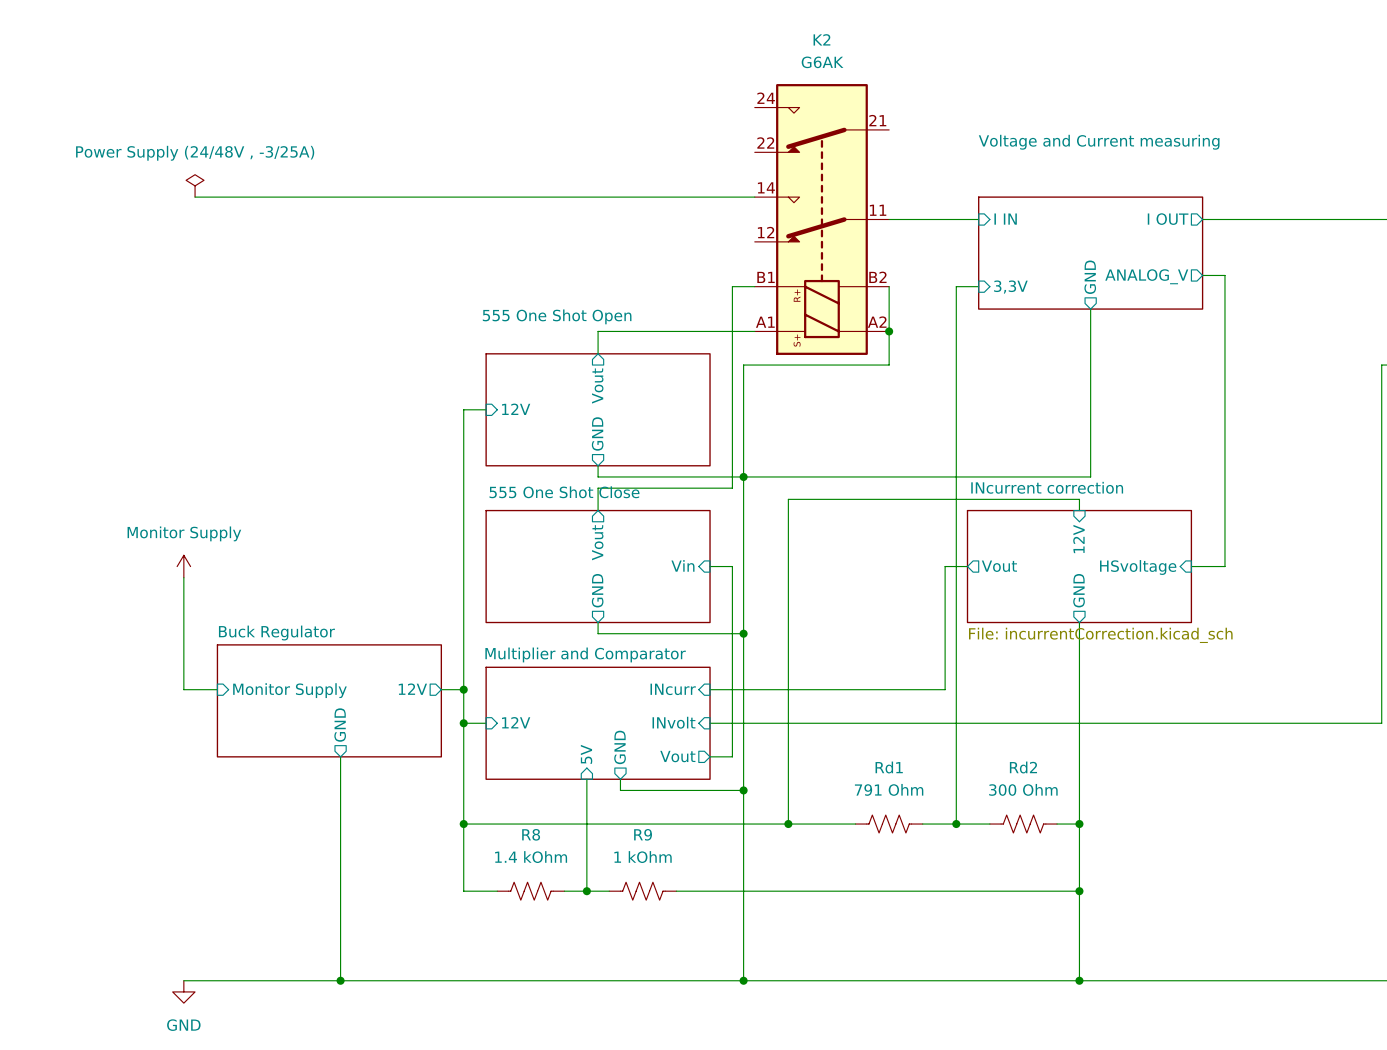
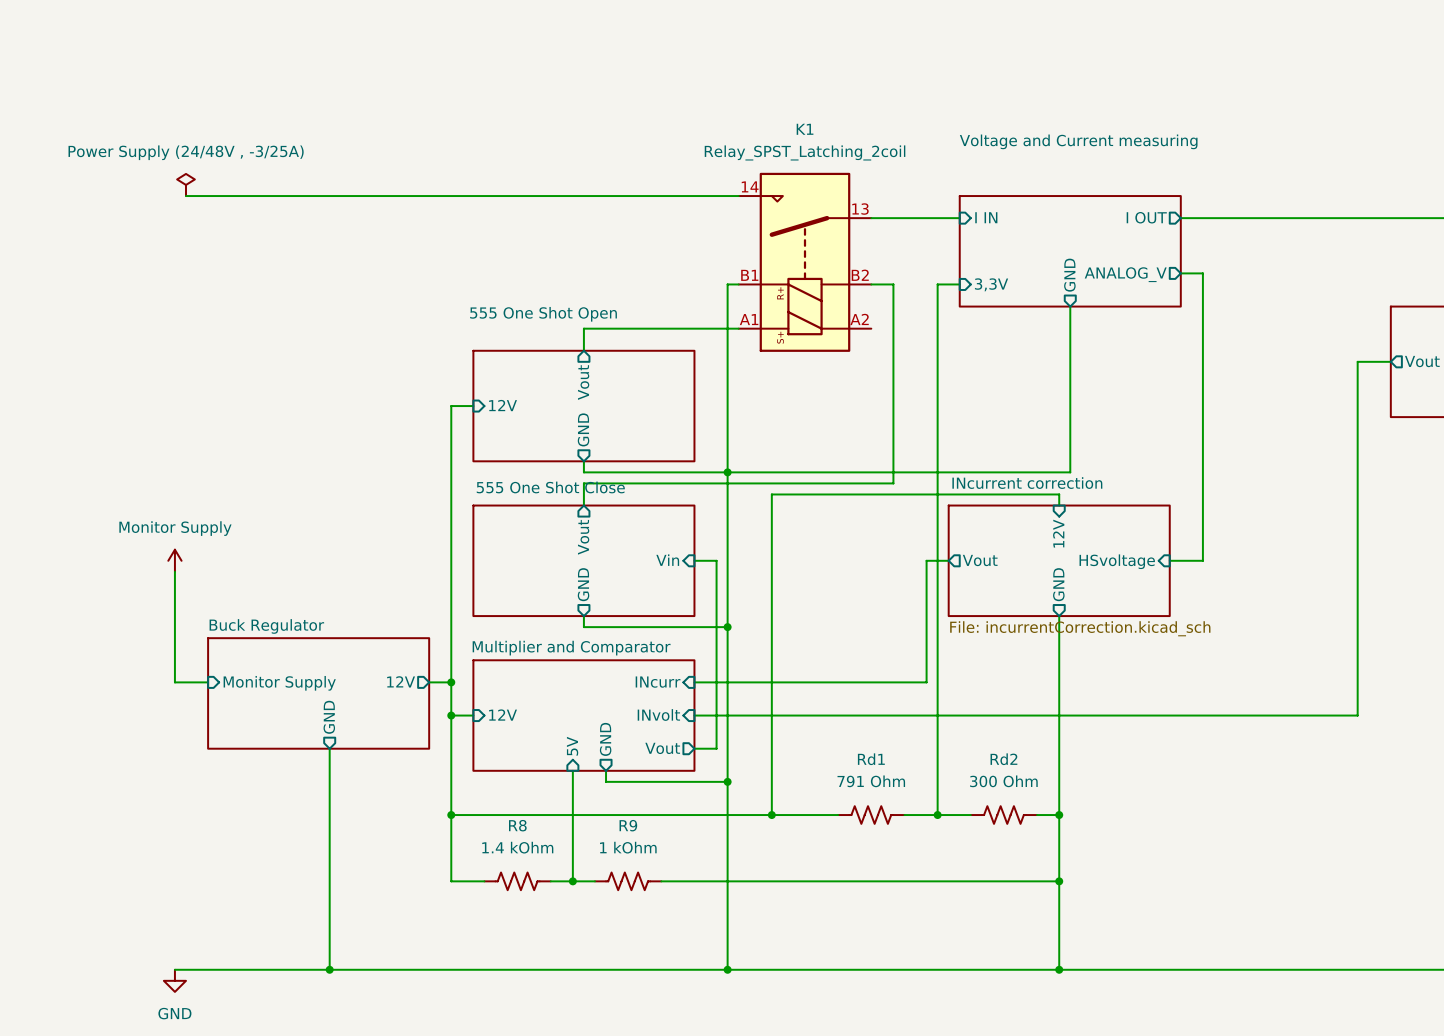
K2: G6AK (821, 219) -> none
K1: none -> Relay_SPST_Latching_2coil (804, 262)
wire: (743, 286) (732, 286) (732, 488) -> (727, 284) (727, 361)
wire: (889, 286) (889, 365) (743, 365) -> (871, 284) (893, 284) (893, 483) (716, 483)
junction: (889, 331) -> none

